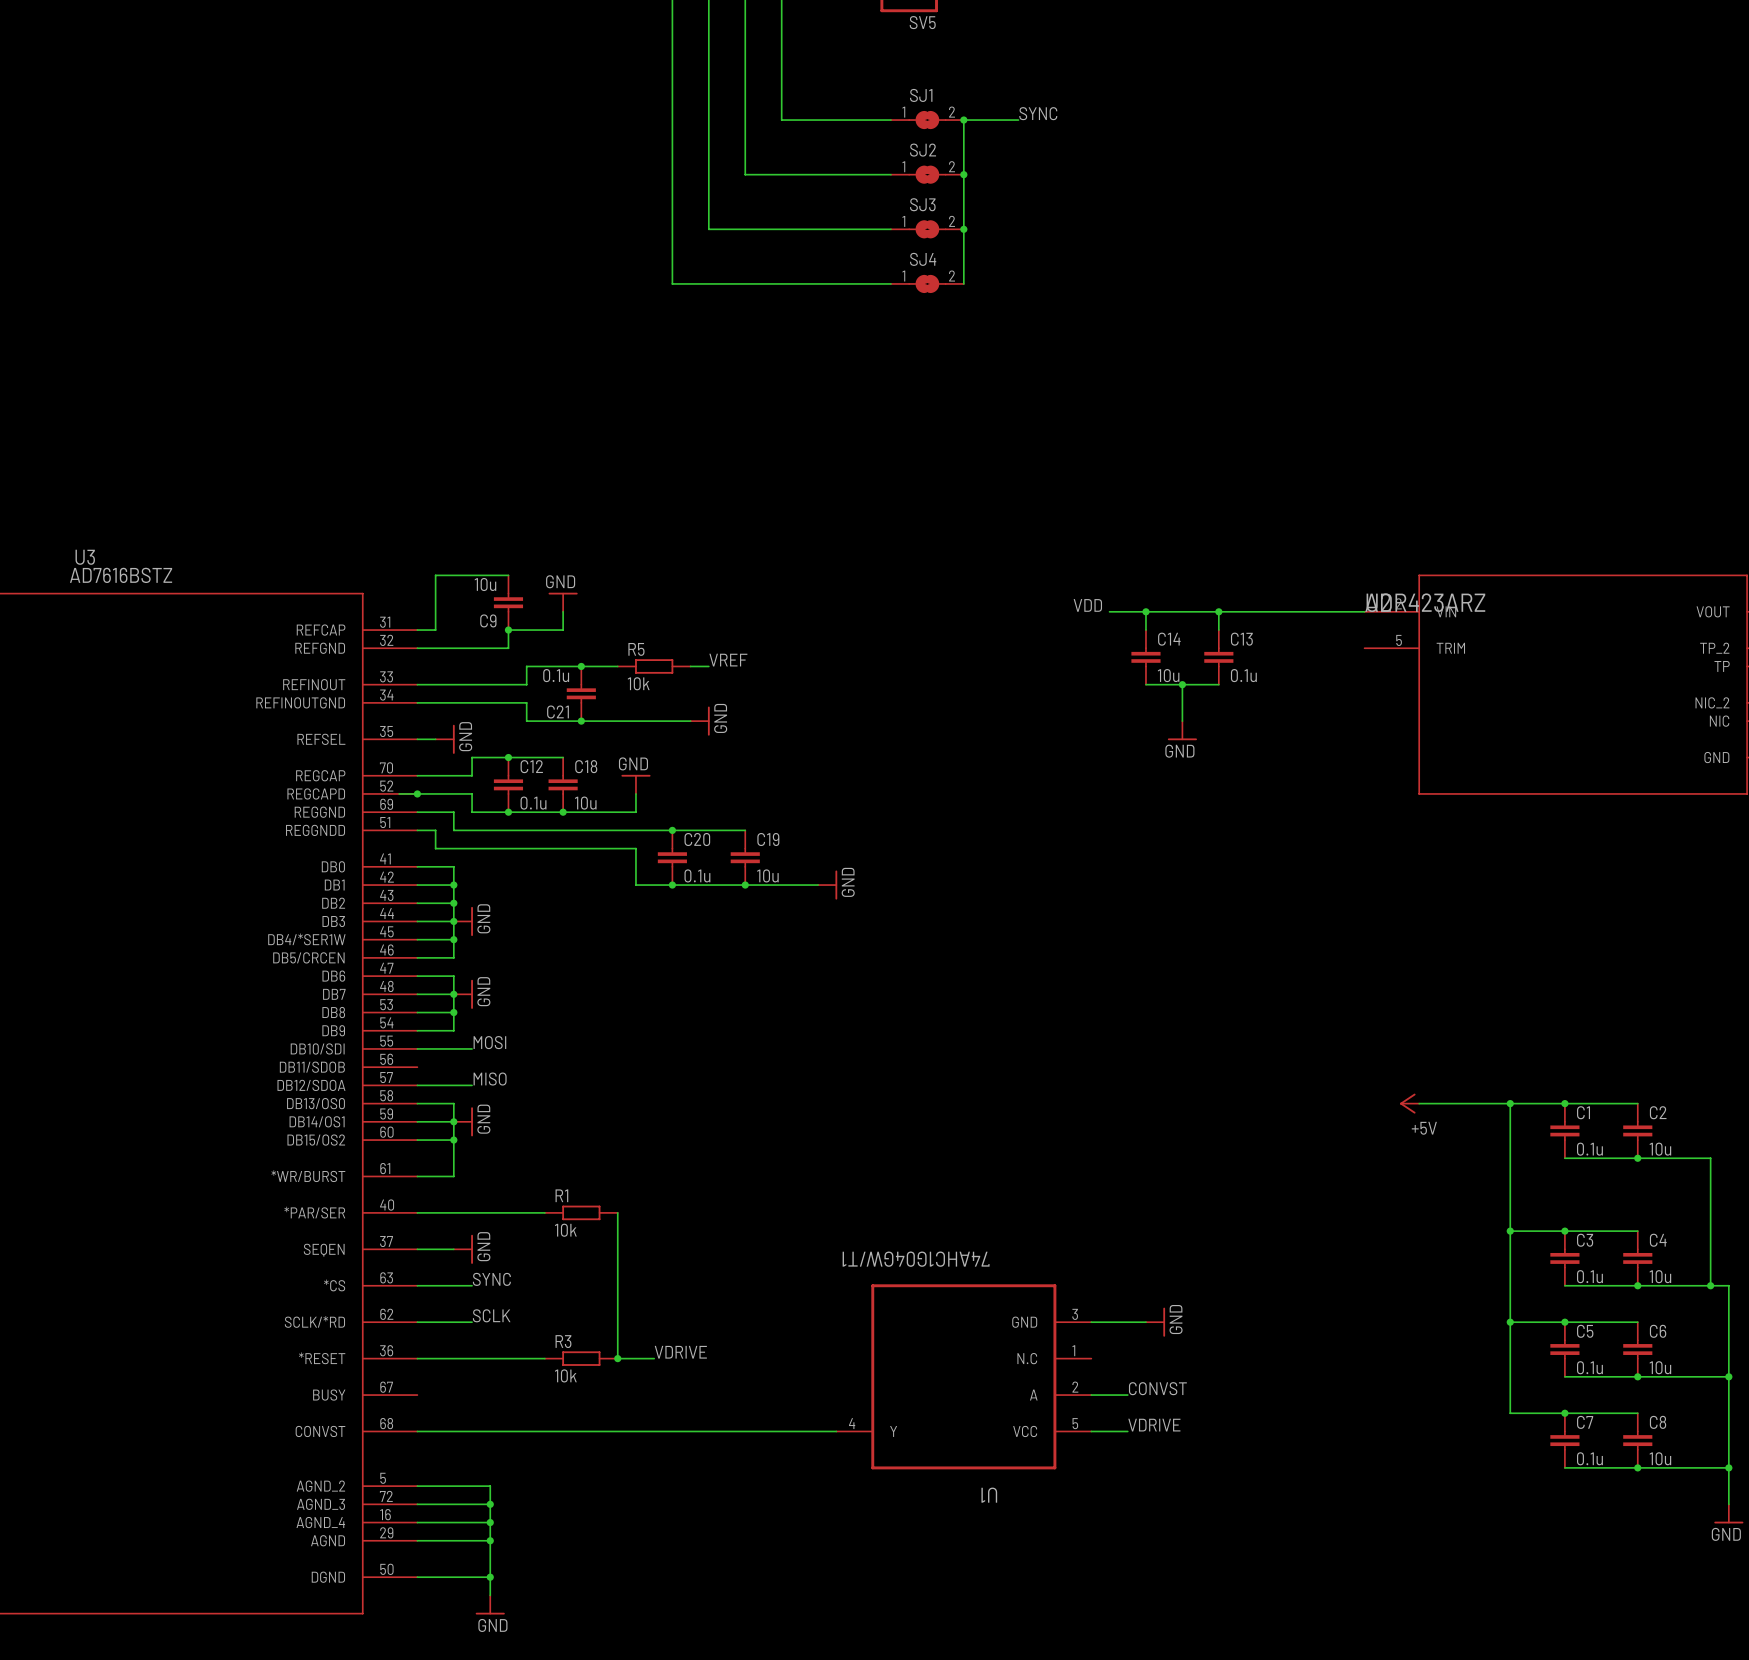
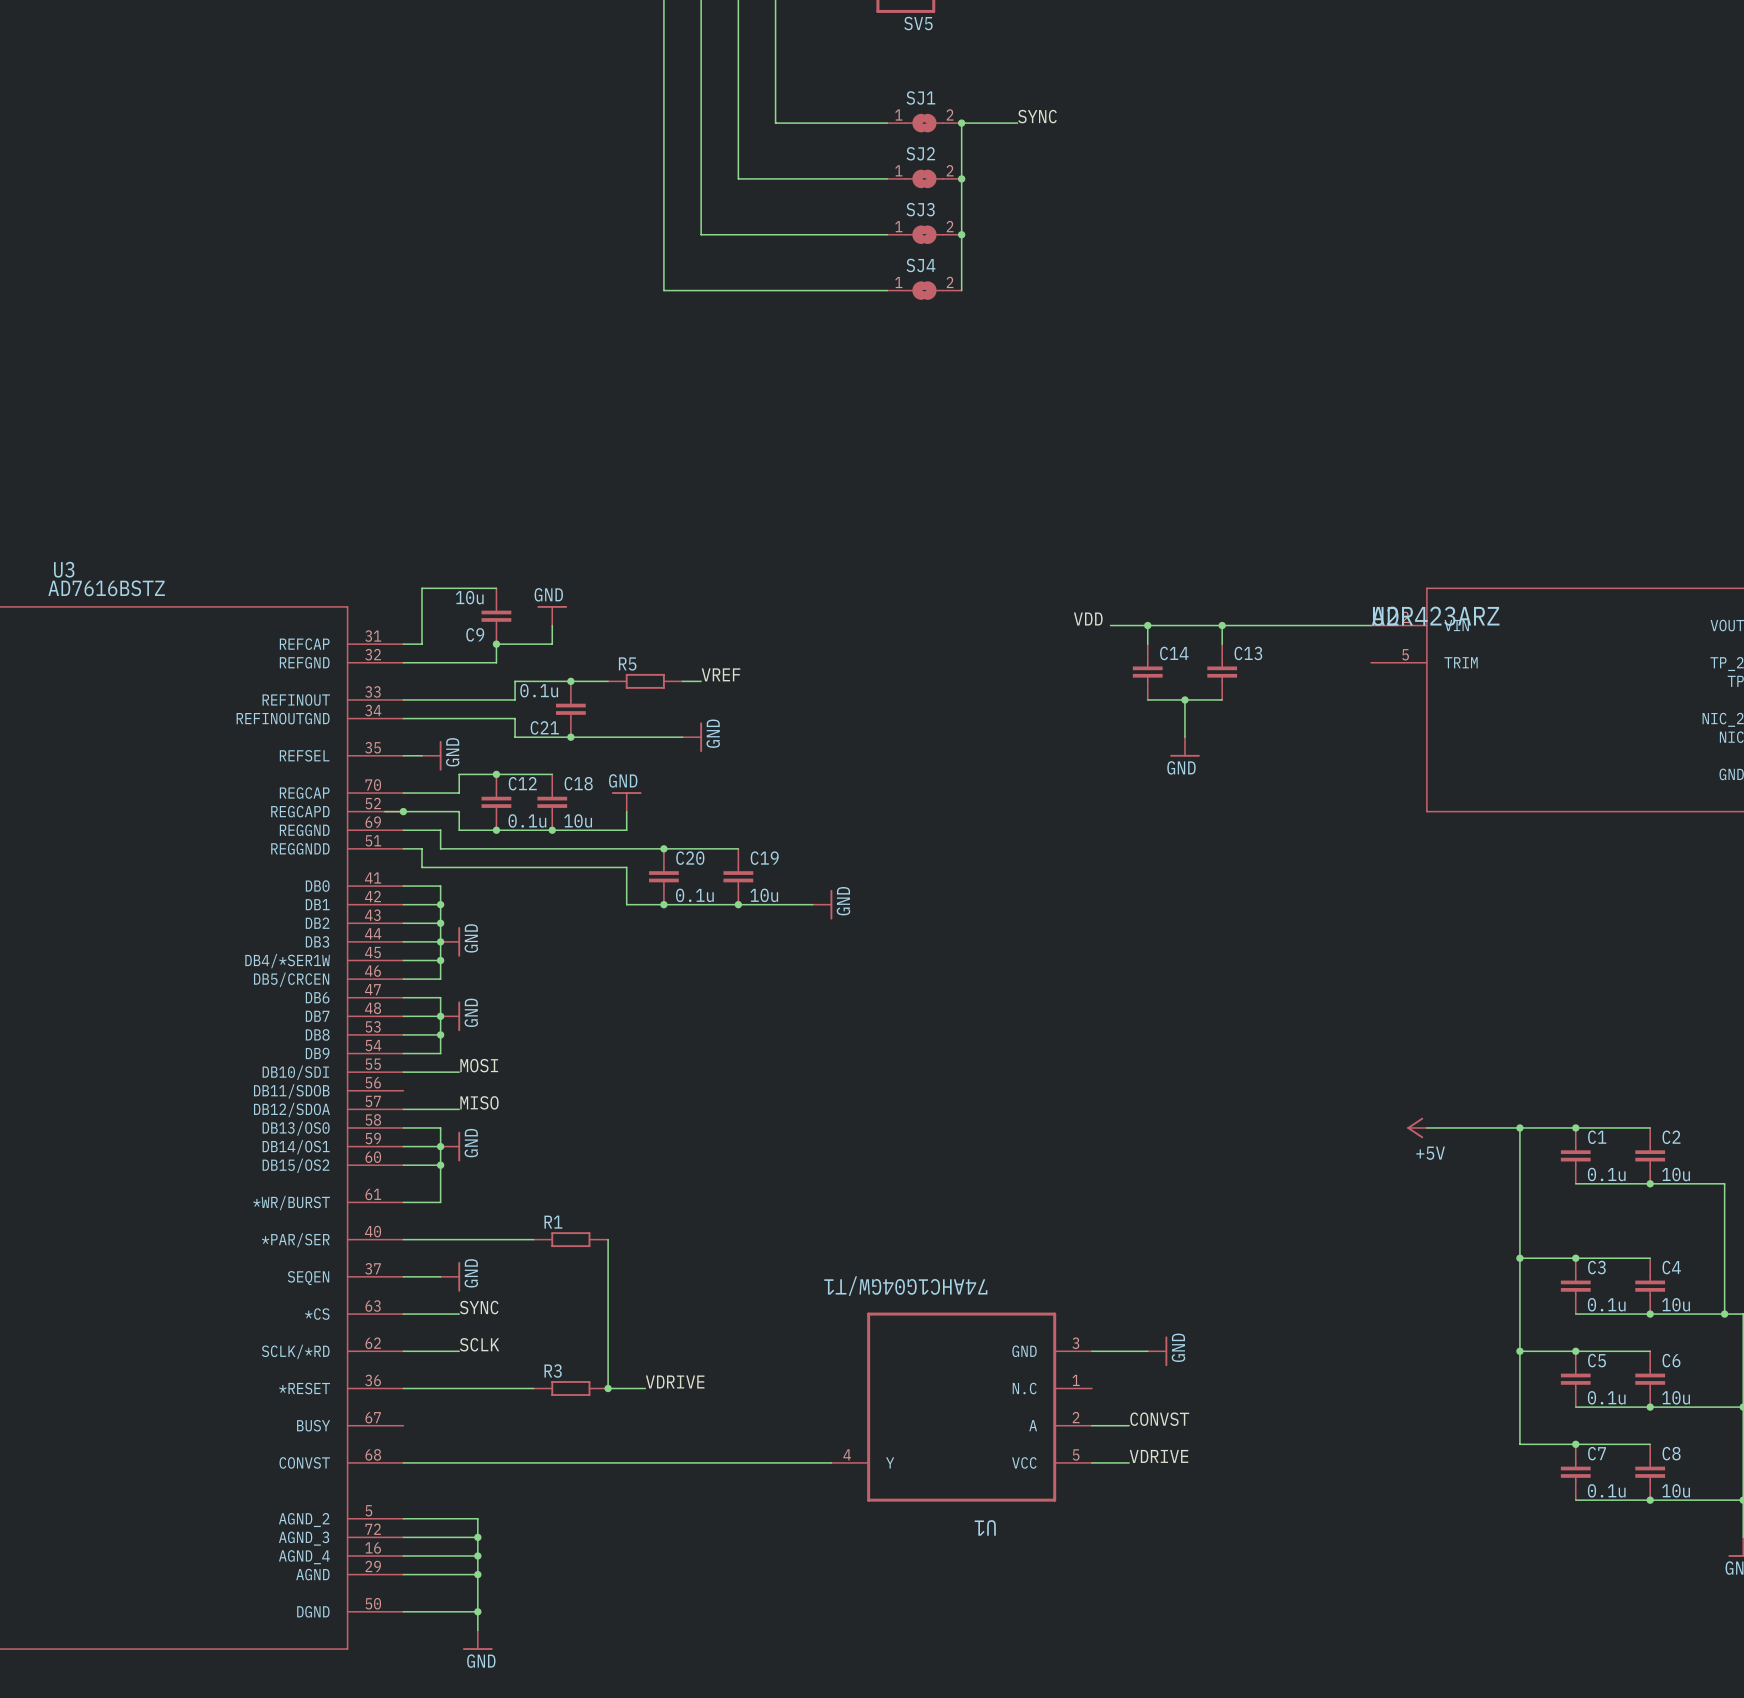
C14 value: 10u (1168, 675) -> none
C13 value: 0.1u (1243, 675) -> none
R5 value: 10k (638, 683) -> none
R1 value: 10k (565, 1230) -> none
R3 value: 10k (565, 1375) -> none

